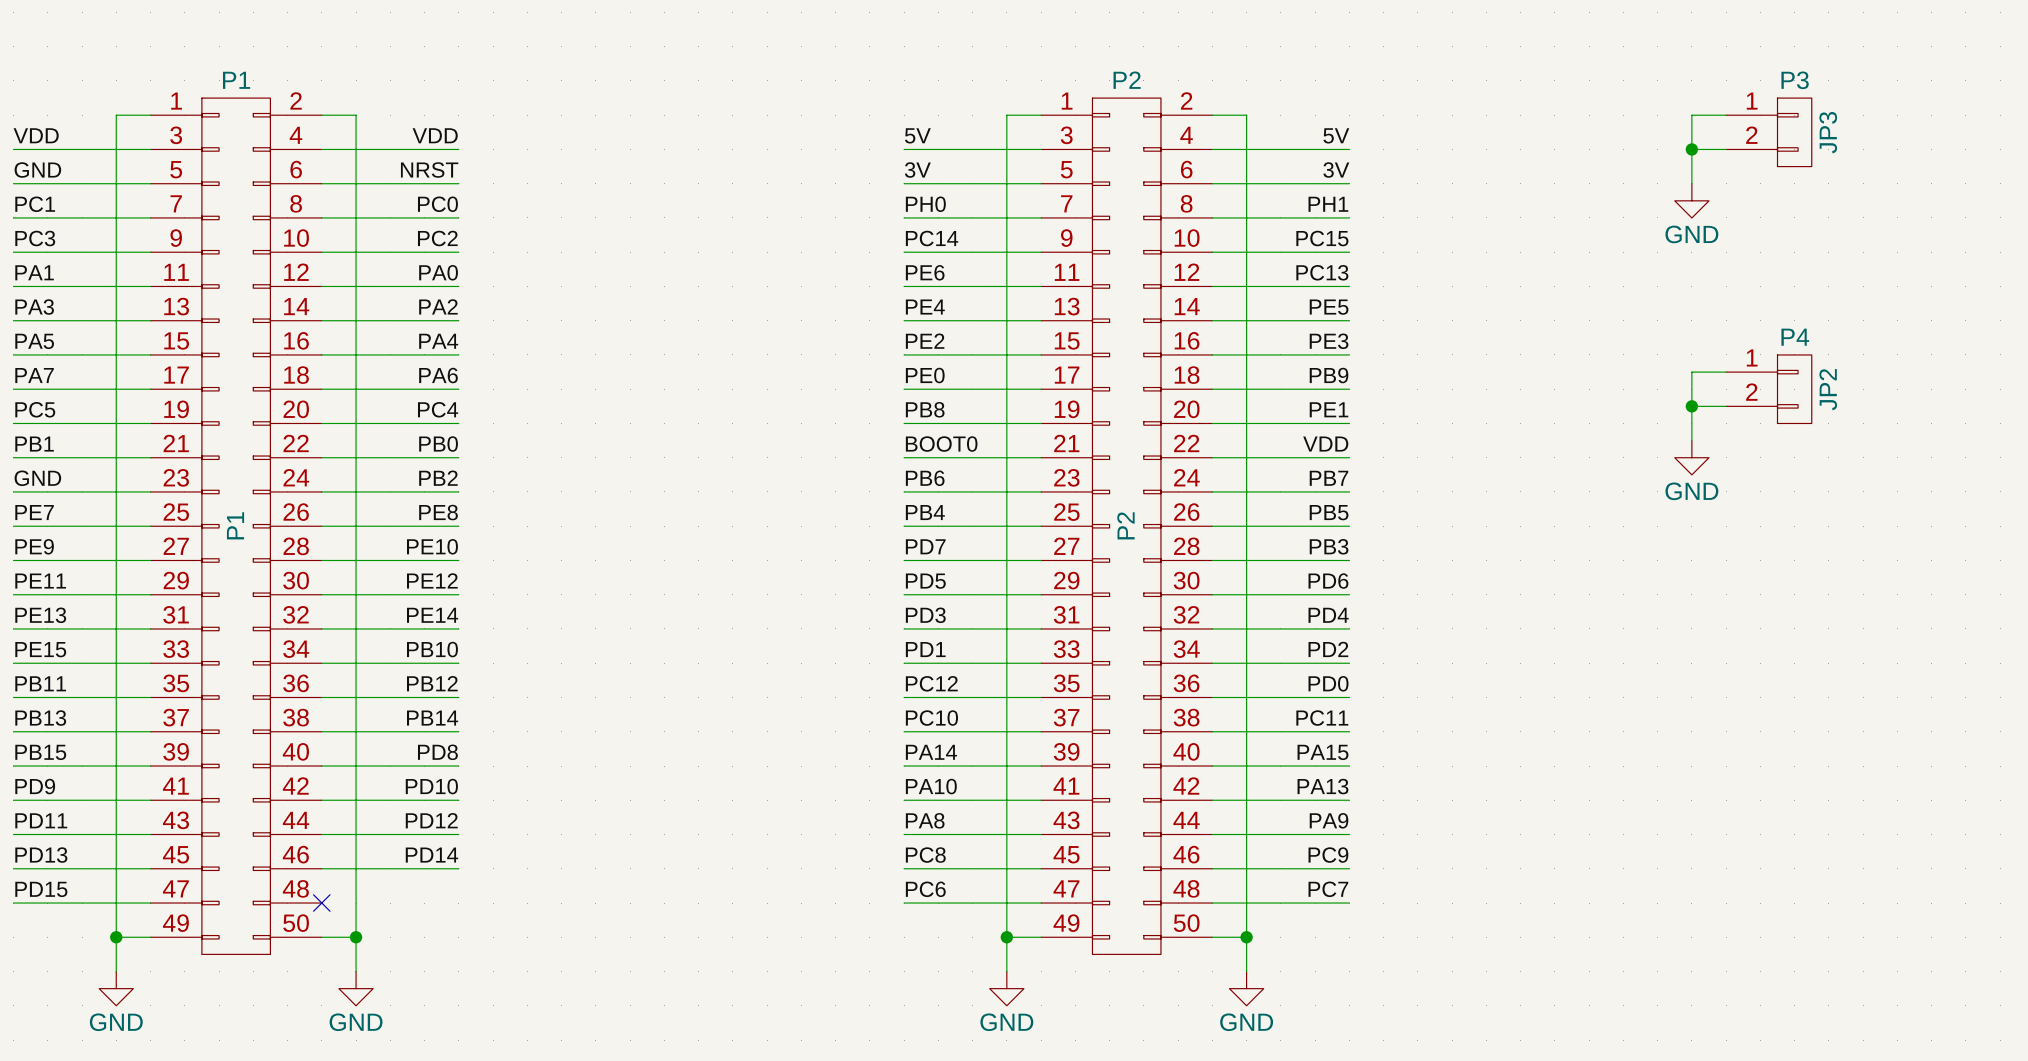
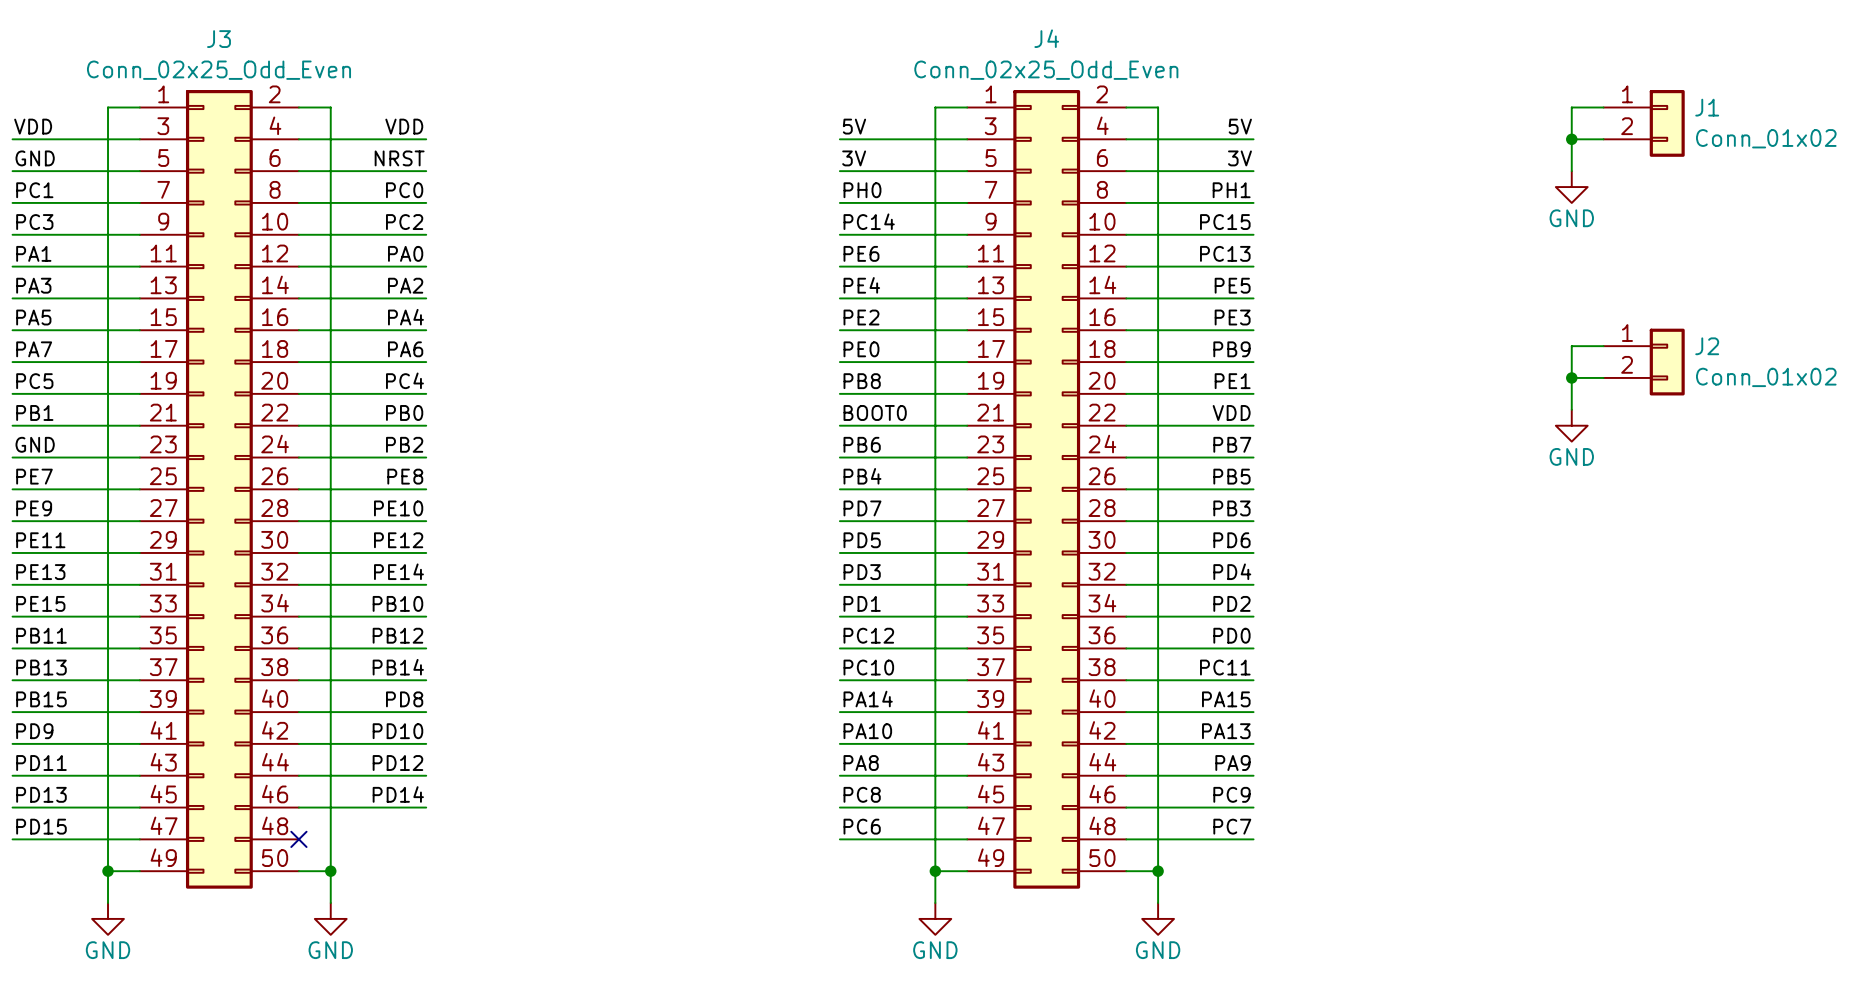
P3: JP3 (1768, 132) -> none
J1: none -> Conn_01x02 (1644, 123)
P4: JP2 (1768, 389) -> none
J2: none -> Conn_01x02 (1644, 362)
P1: P1 (236, 526) -> none
J3: none -> Conn_02x25_Odd_Even (219, 489)
P2: P2 (1126, 526) -> none
J4: none -> Conn_02x25_Odd_Even (1046, 489)

